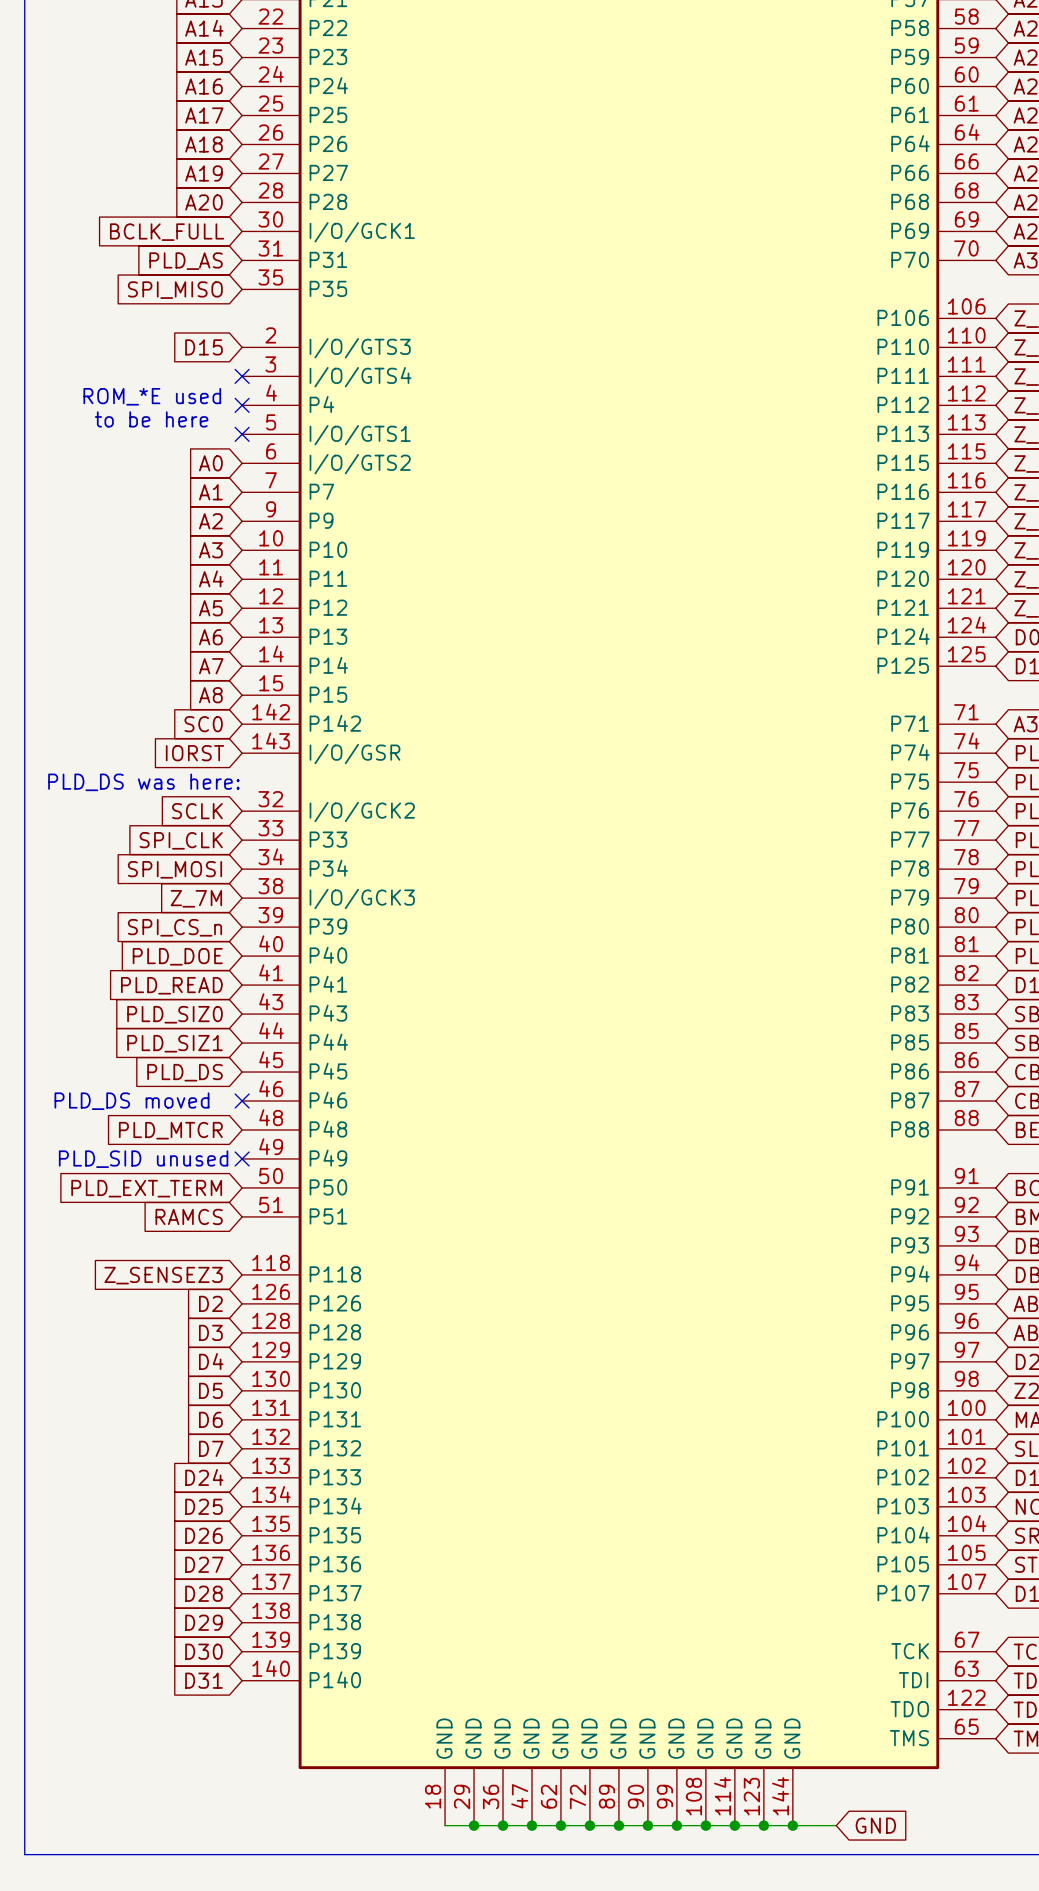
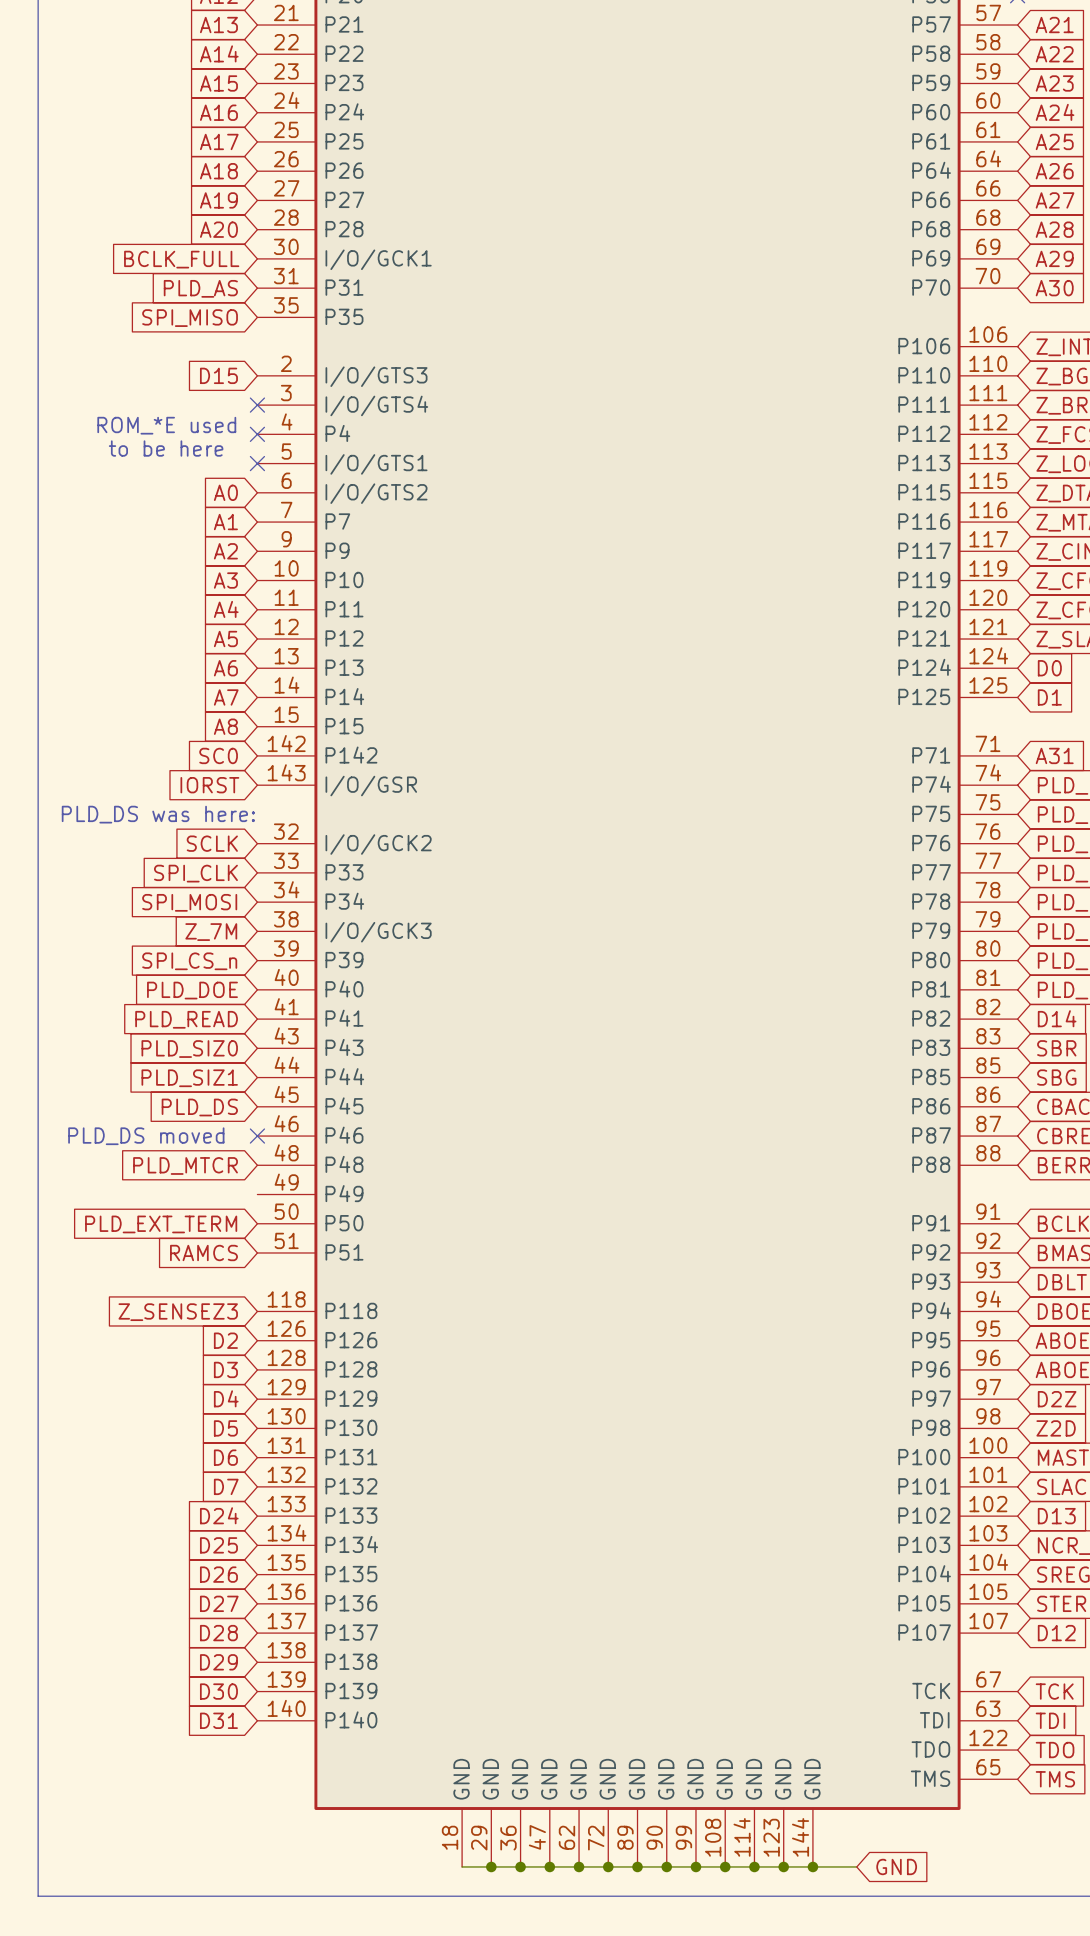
no-connect mark: (242, 1158) -> none
text: PLD_SID unused (143, 1159) -> none

